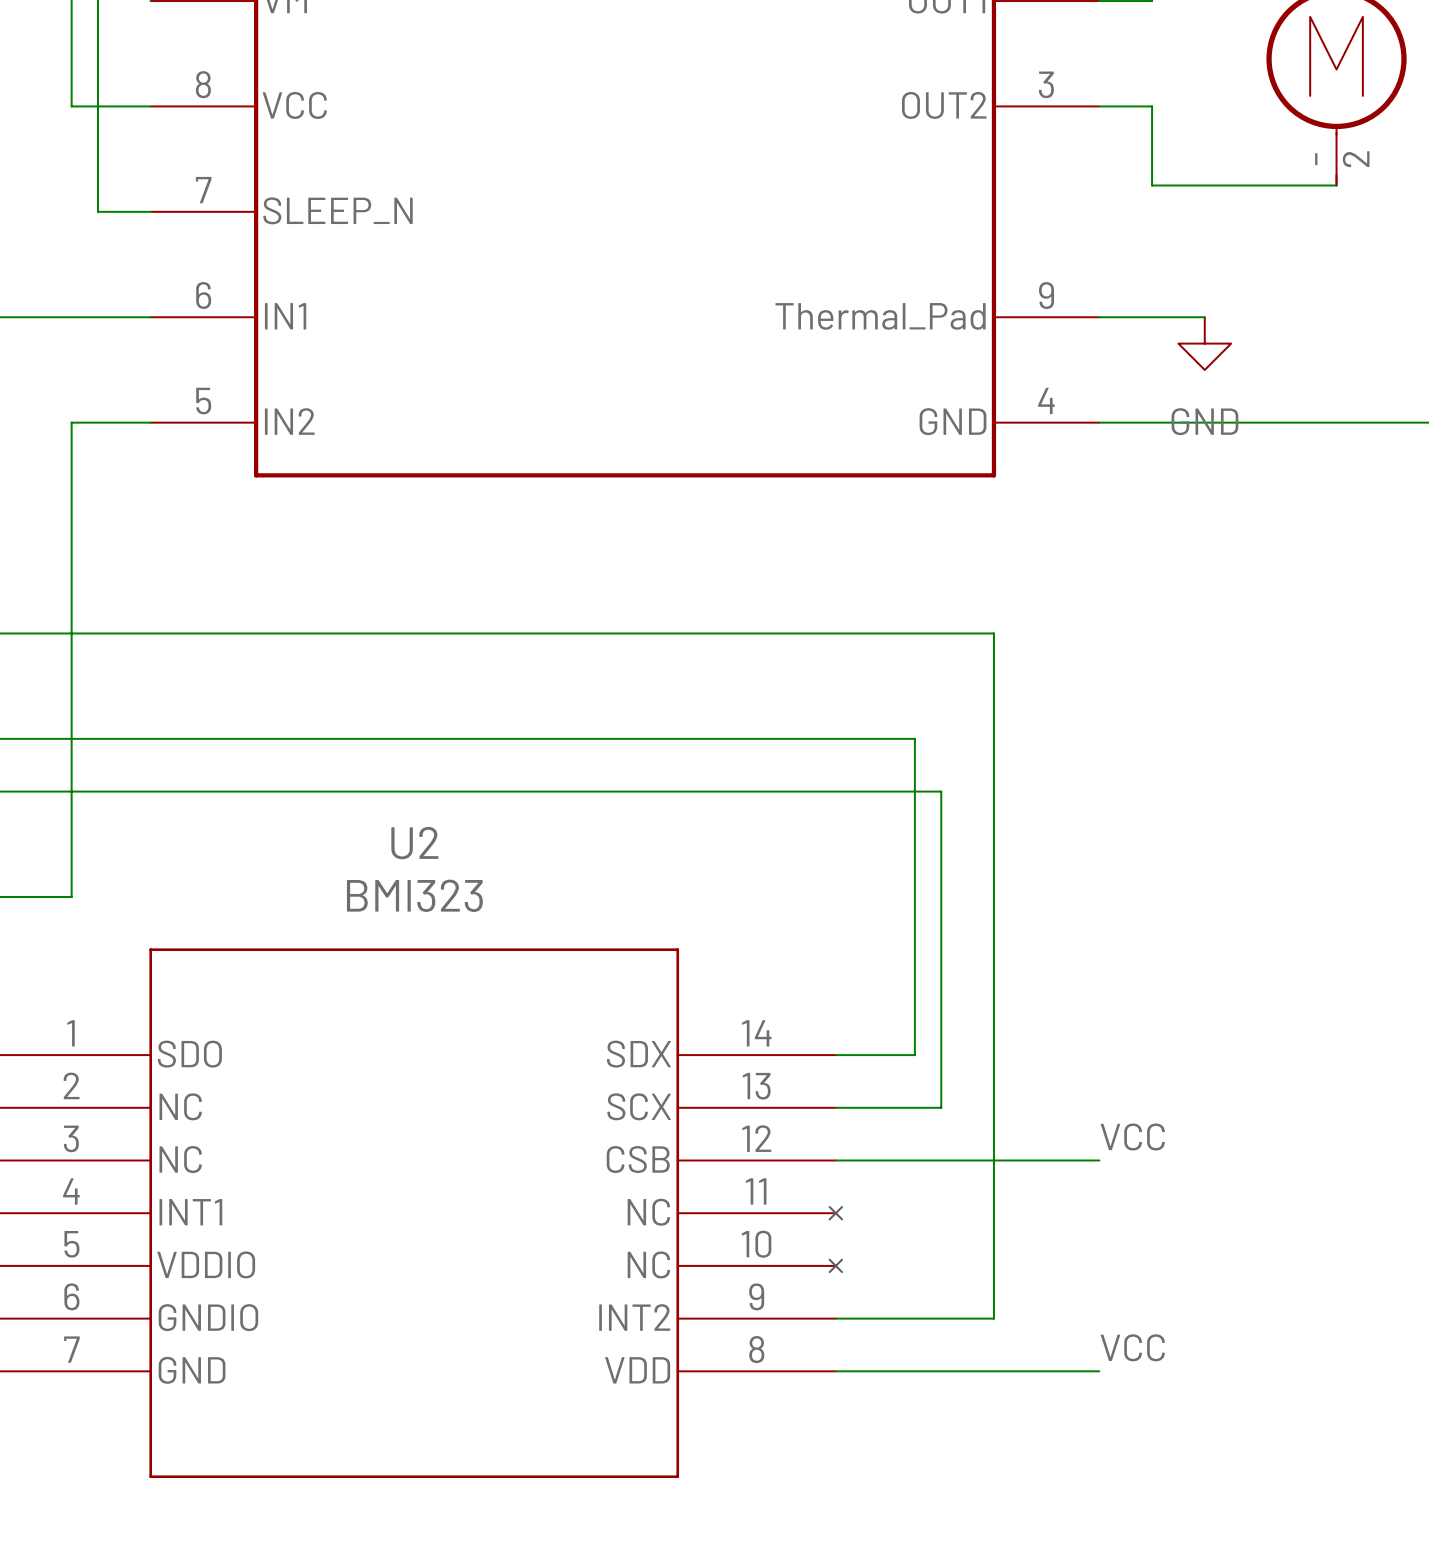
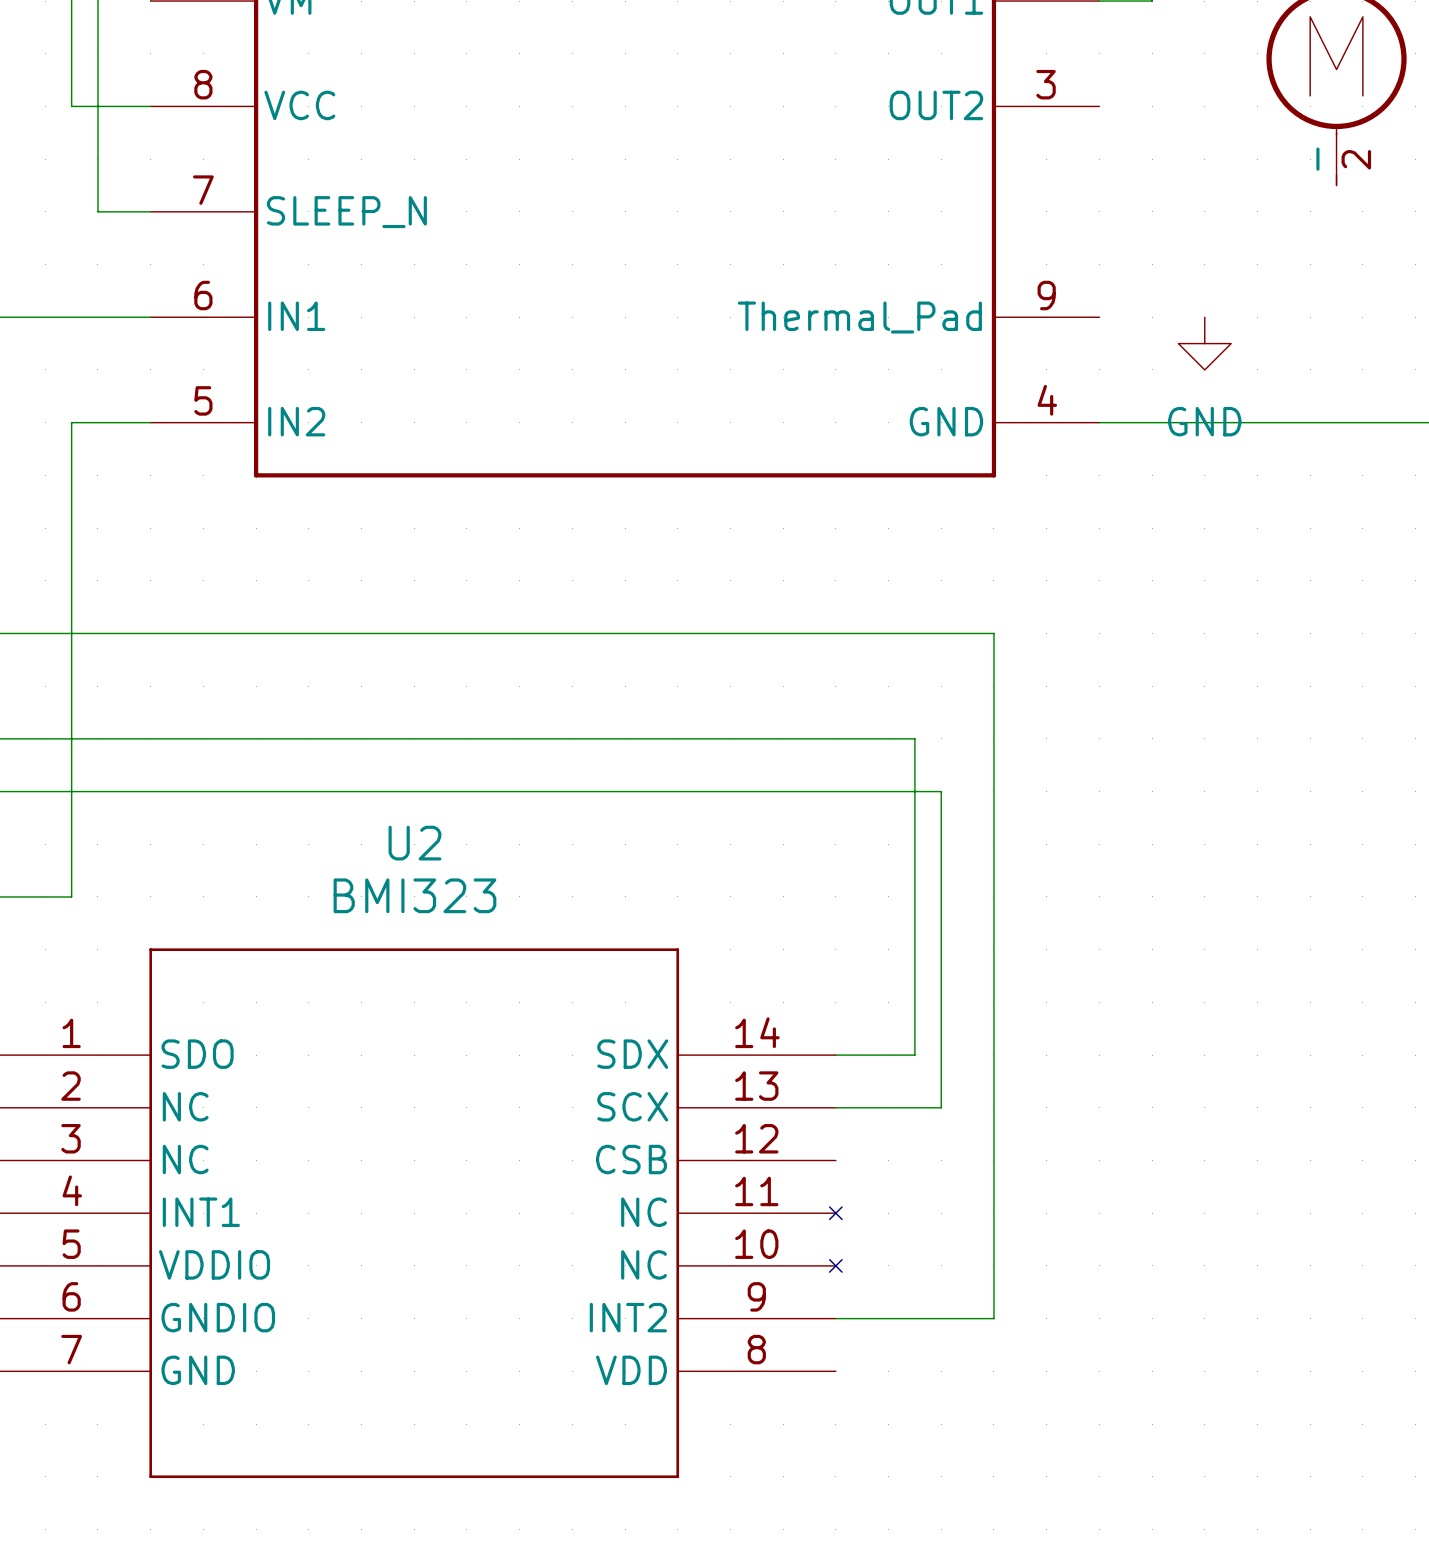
wire: (1099, 106) (1152, 106) (1152, 185) (1336, 185) -> none
wire: (1099, 317) (1204, 317) -> none
label: VCC (1132, 1137) -> none
wire: (835, 1160) (1099, 1160) -> none
label: VCC (1132, 1347) -> none
wire: (835, 1371) (1099, 1371) -> none

